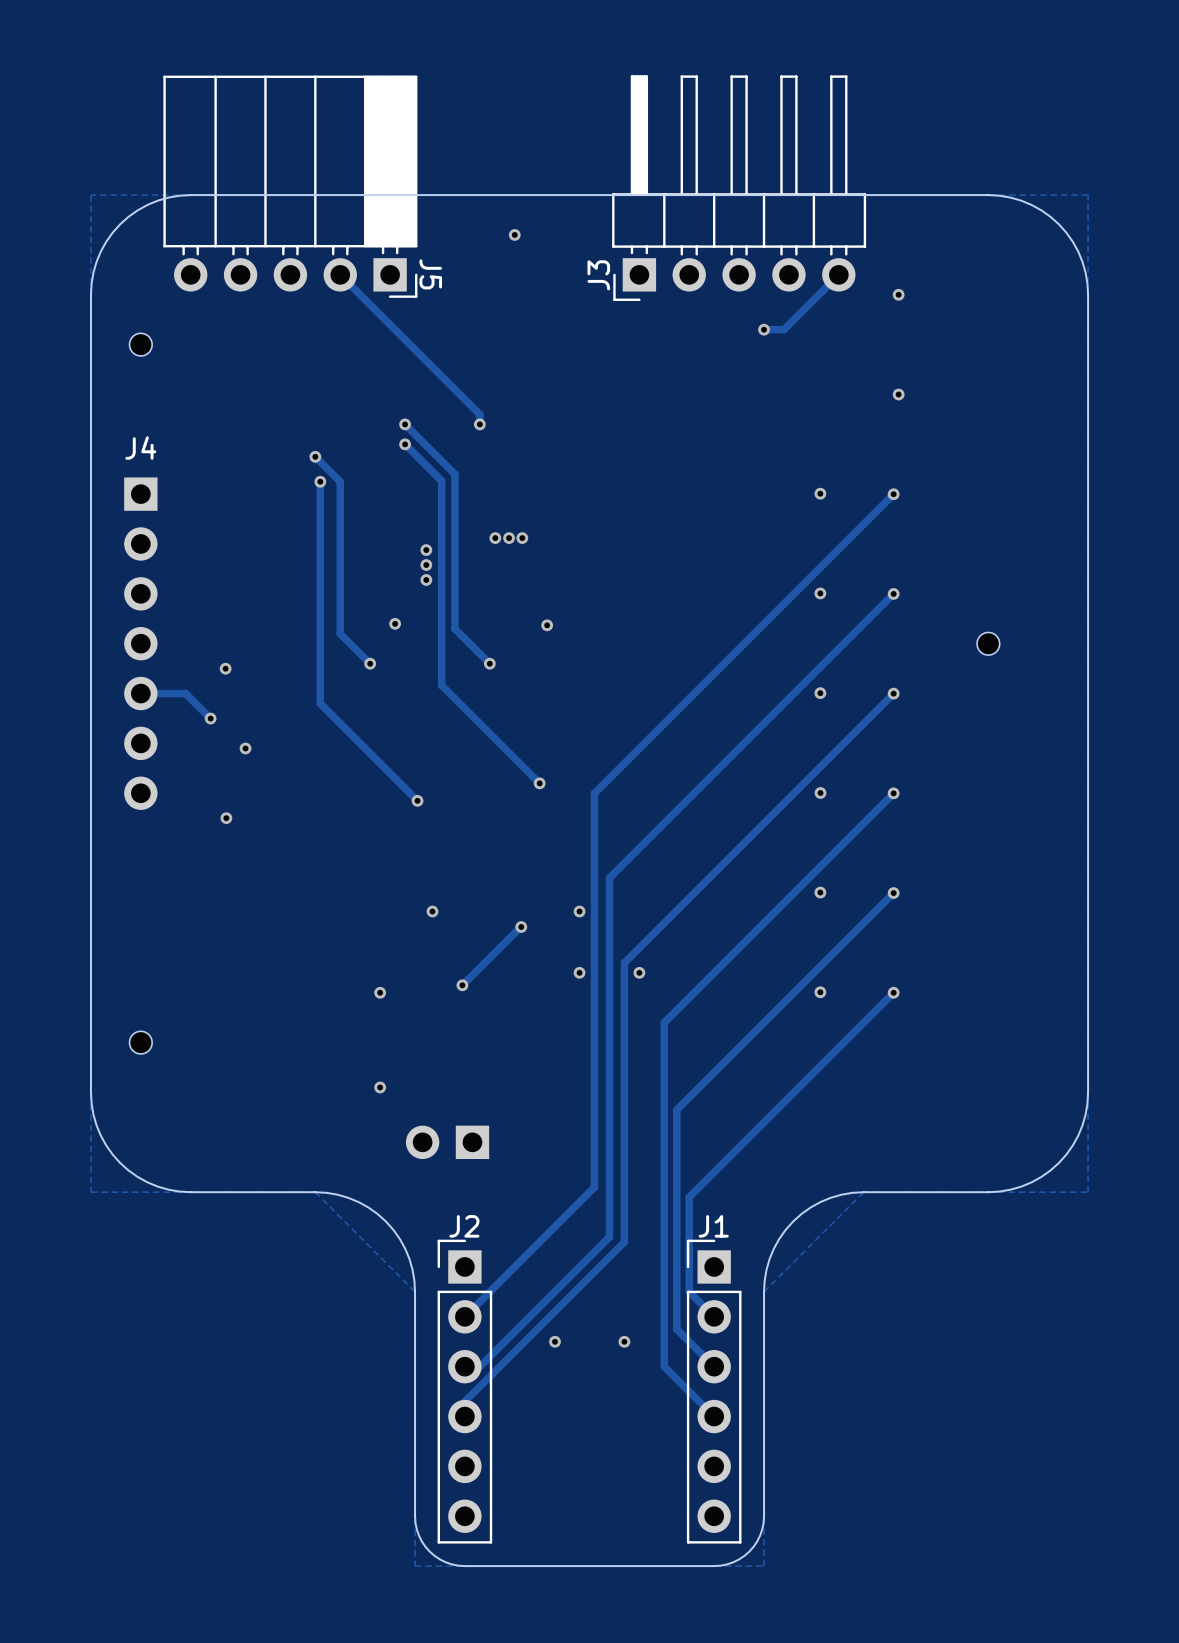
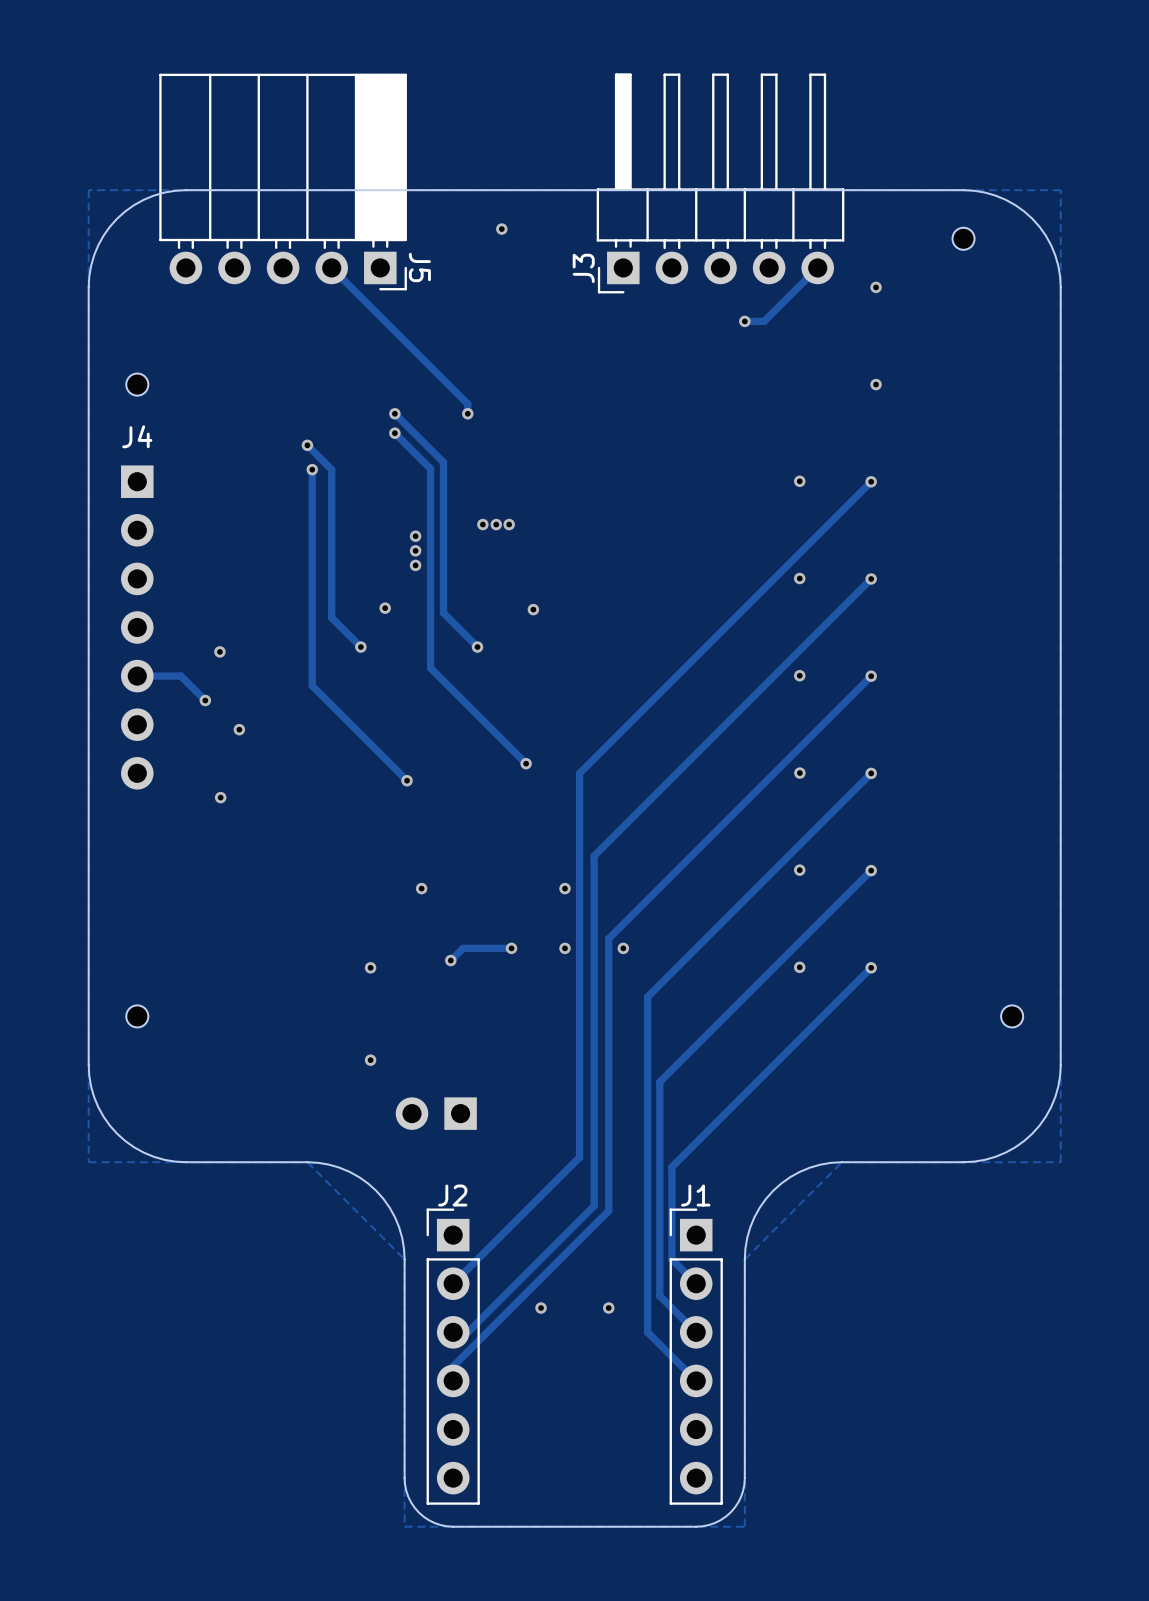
part: none -> (963, 238)
part position: (140, 344) -> (137, 384)
part: (988, 643) -> none
track: (521, 927) (474, 972) -> (511, 948) (462, 948)
via position: (521, 927) -> (511, 948)
part: none -> (1012, 1016)

